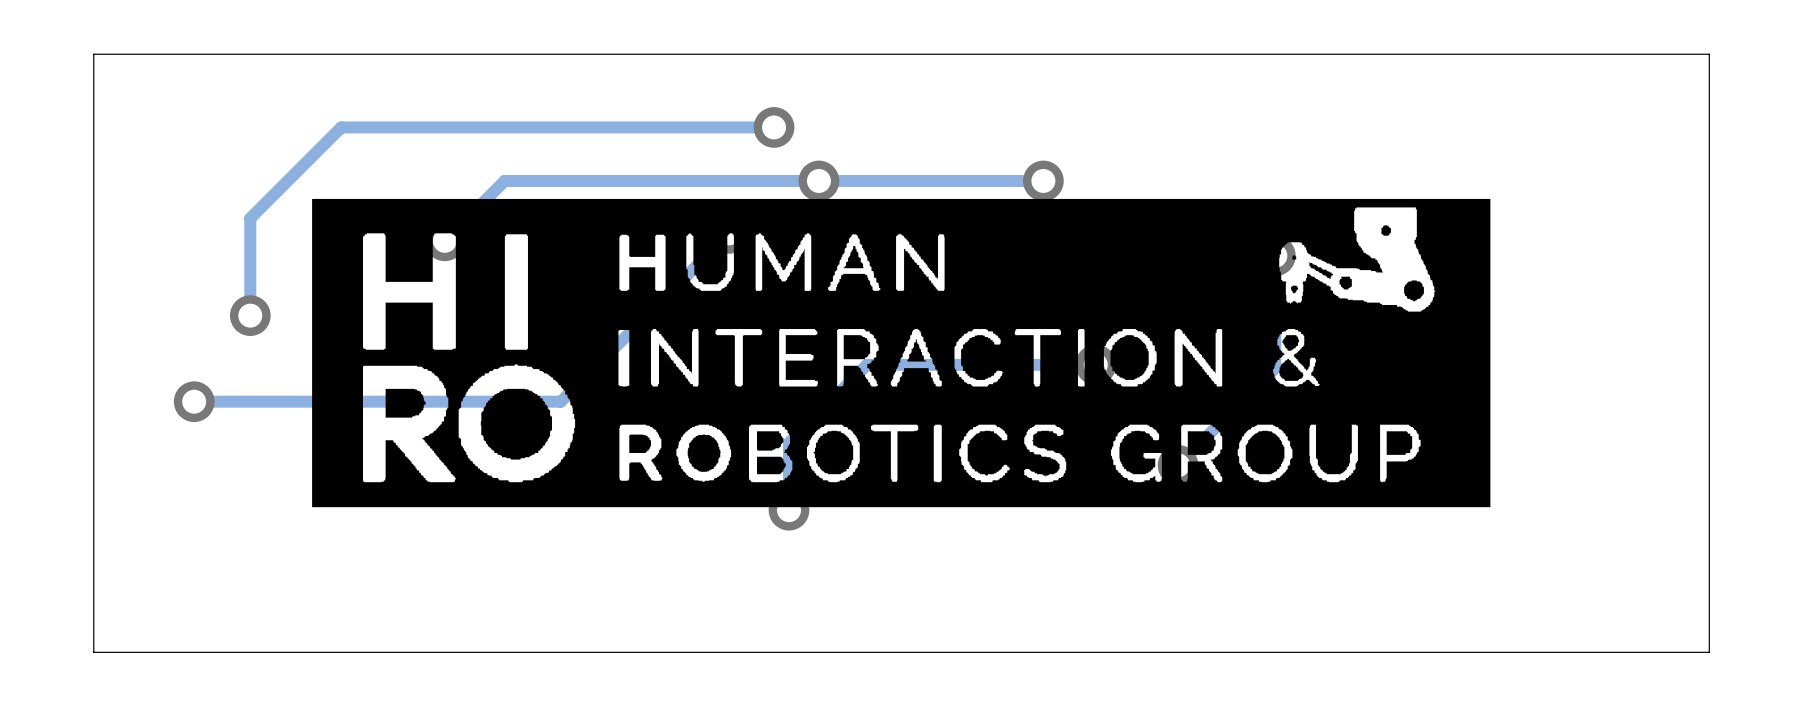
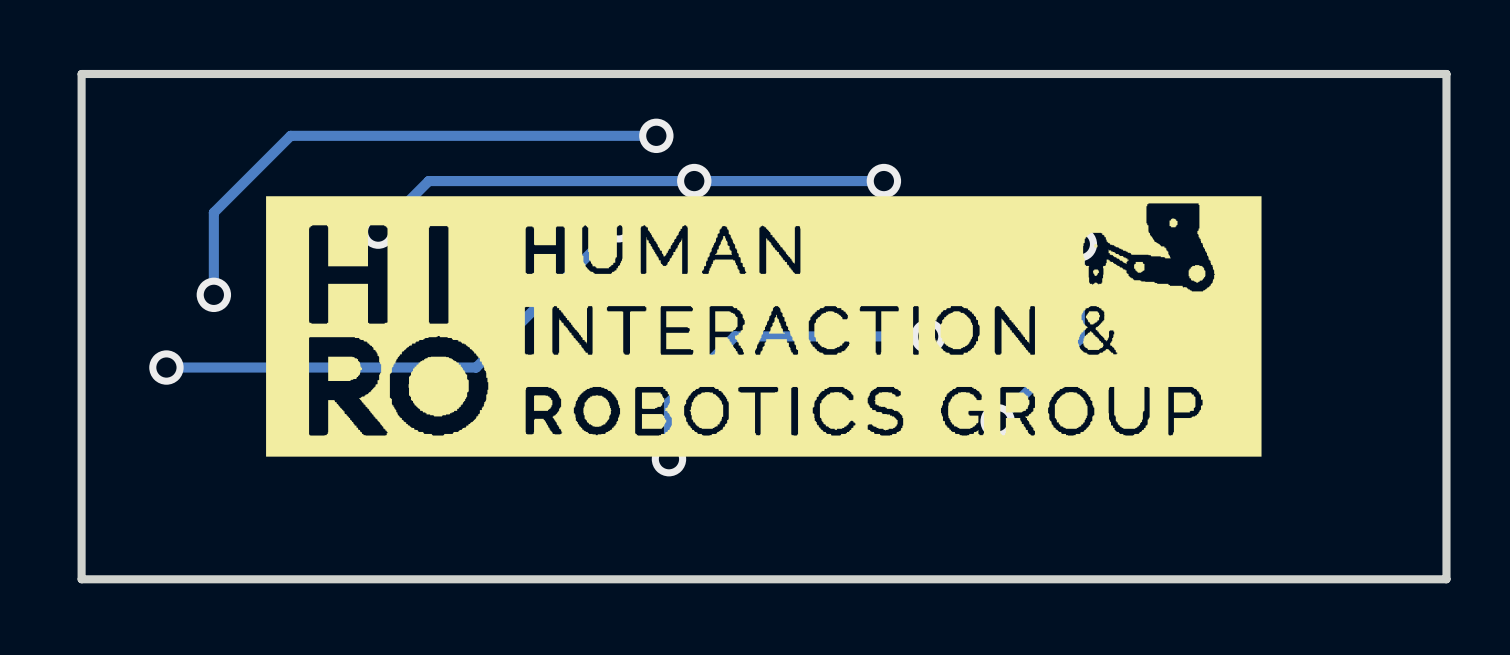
board edge width: thin (1709, 54) (93, 54) (93, 652) (1709, 652) (1709, 54) -> thick (1446, 73) (81, 73) (81, 579) (1446, 579) (1446, 73)

